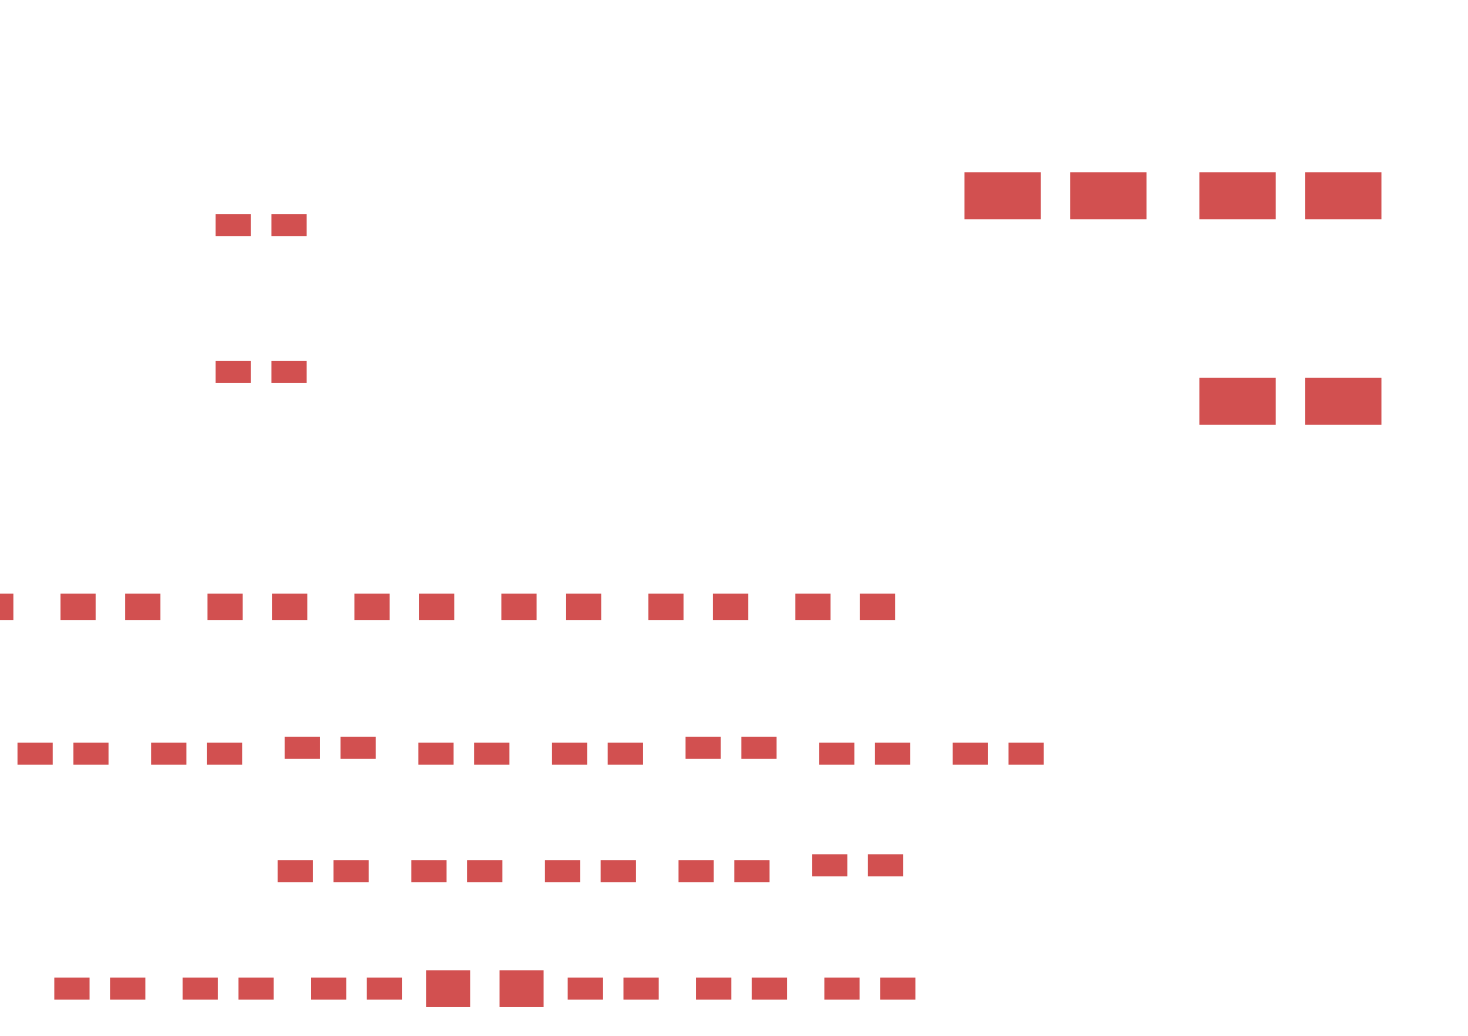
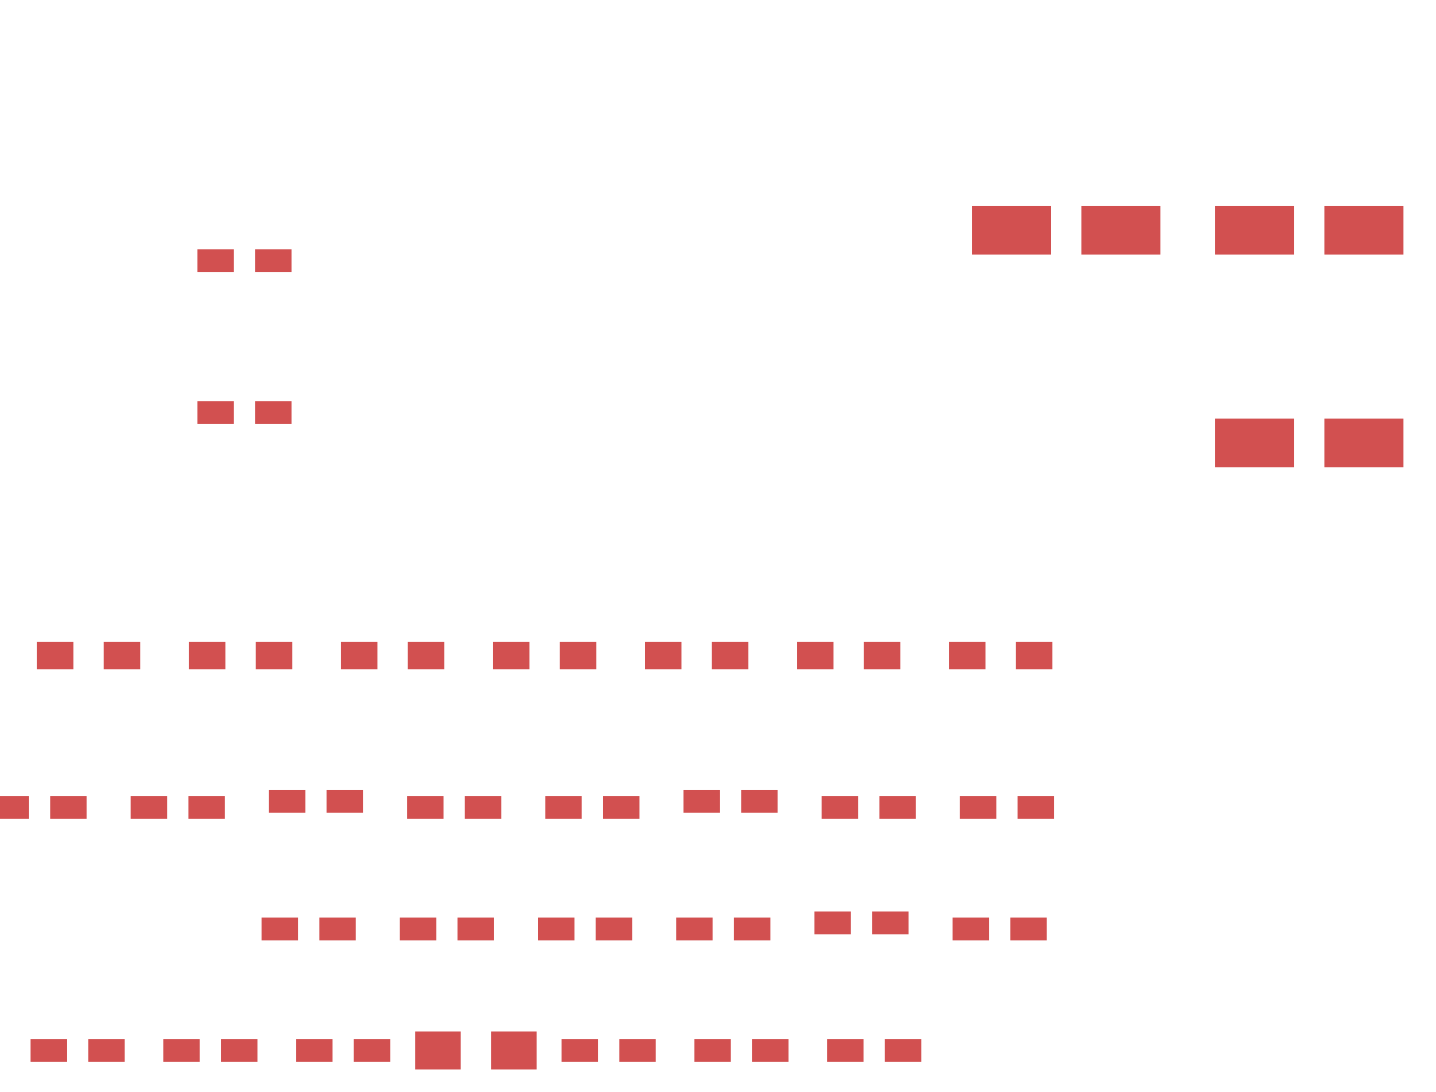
part: none -> (1000, 655)
part: none -> (999, 928)

